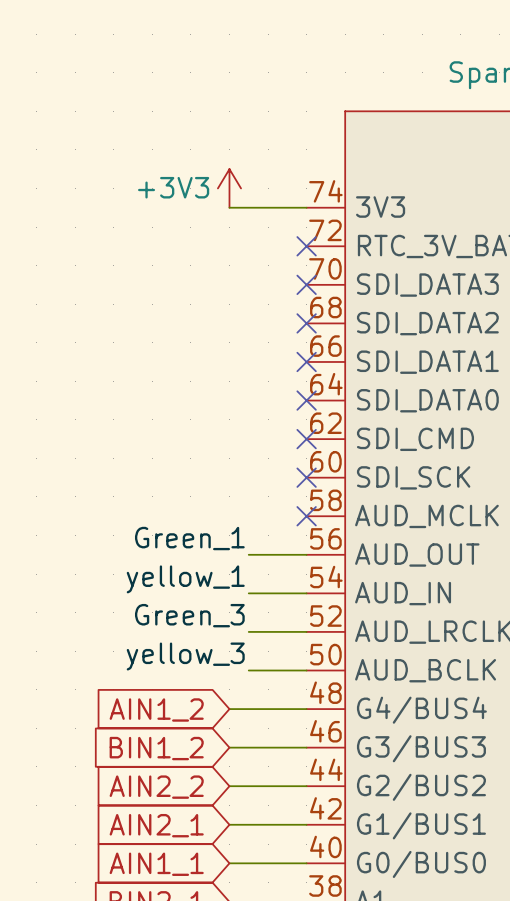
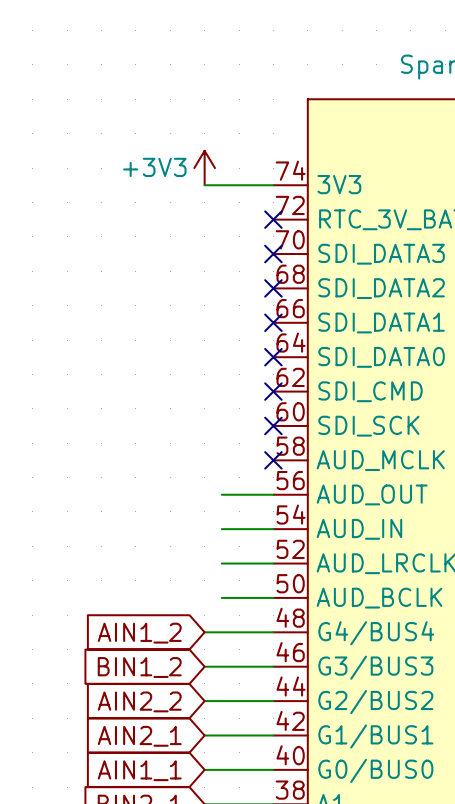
label: Green_1 (189, 538) -> none
label: yellow_1 (185, 579) -> none
label: Green_3 (189, 615) -> none
label: yellow_3 (185, 656) -> none

